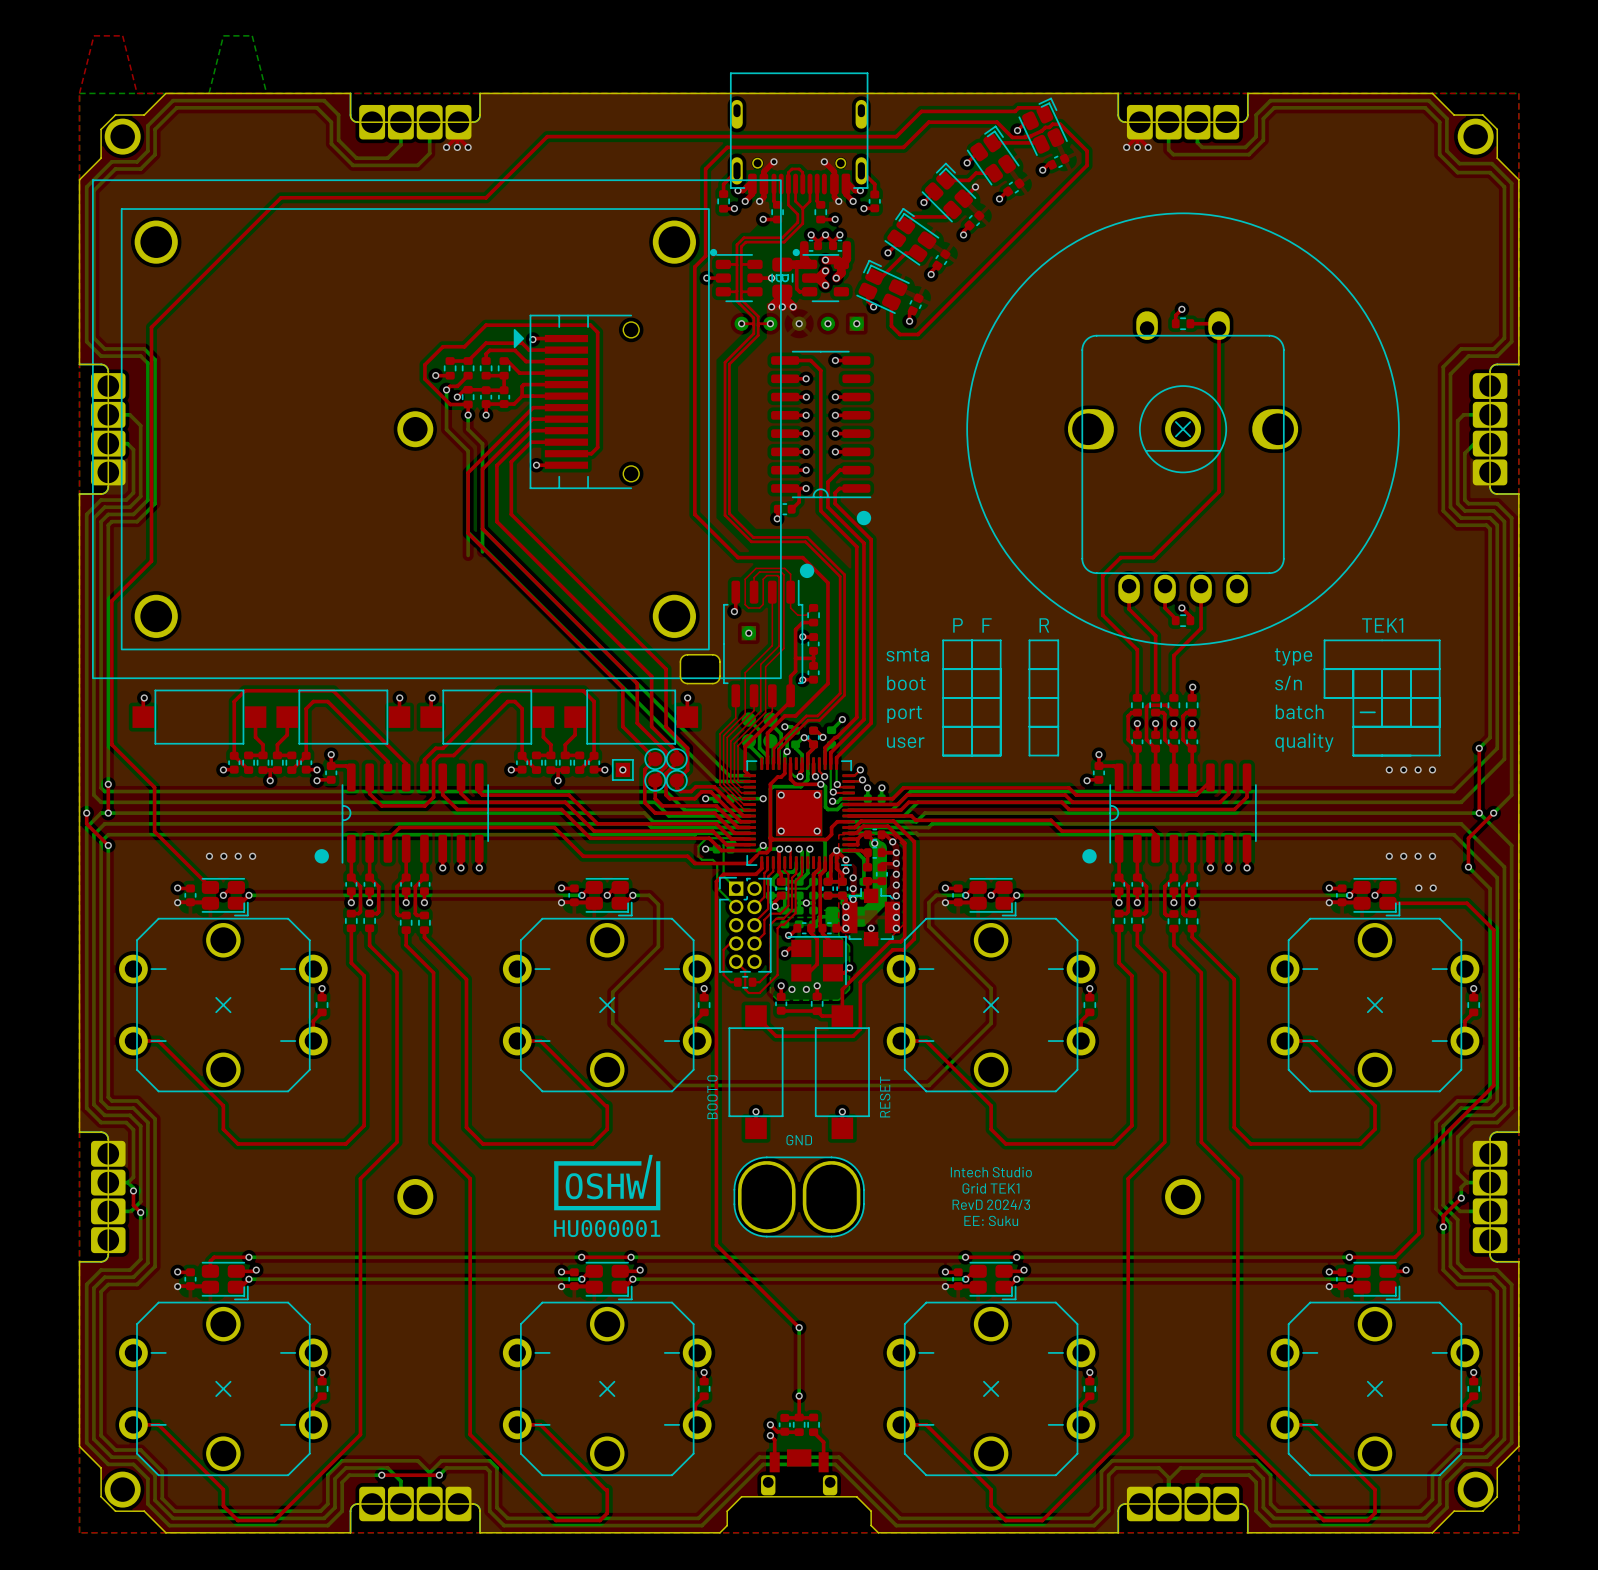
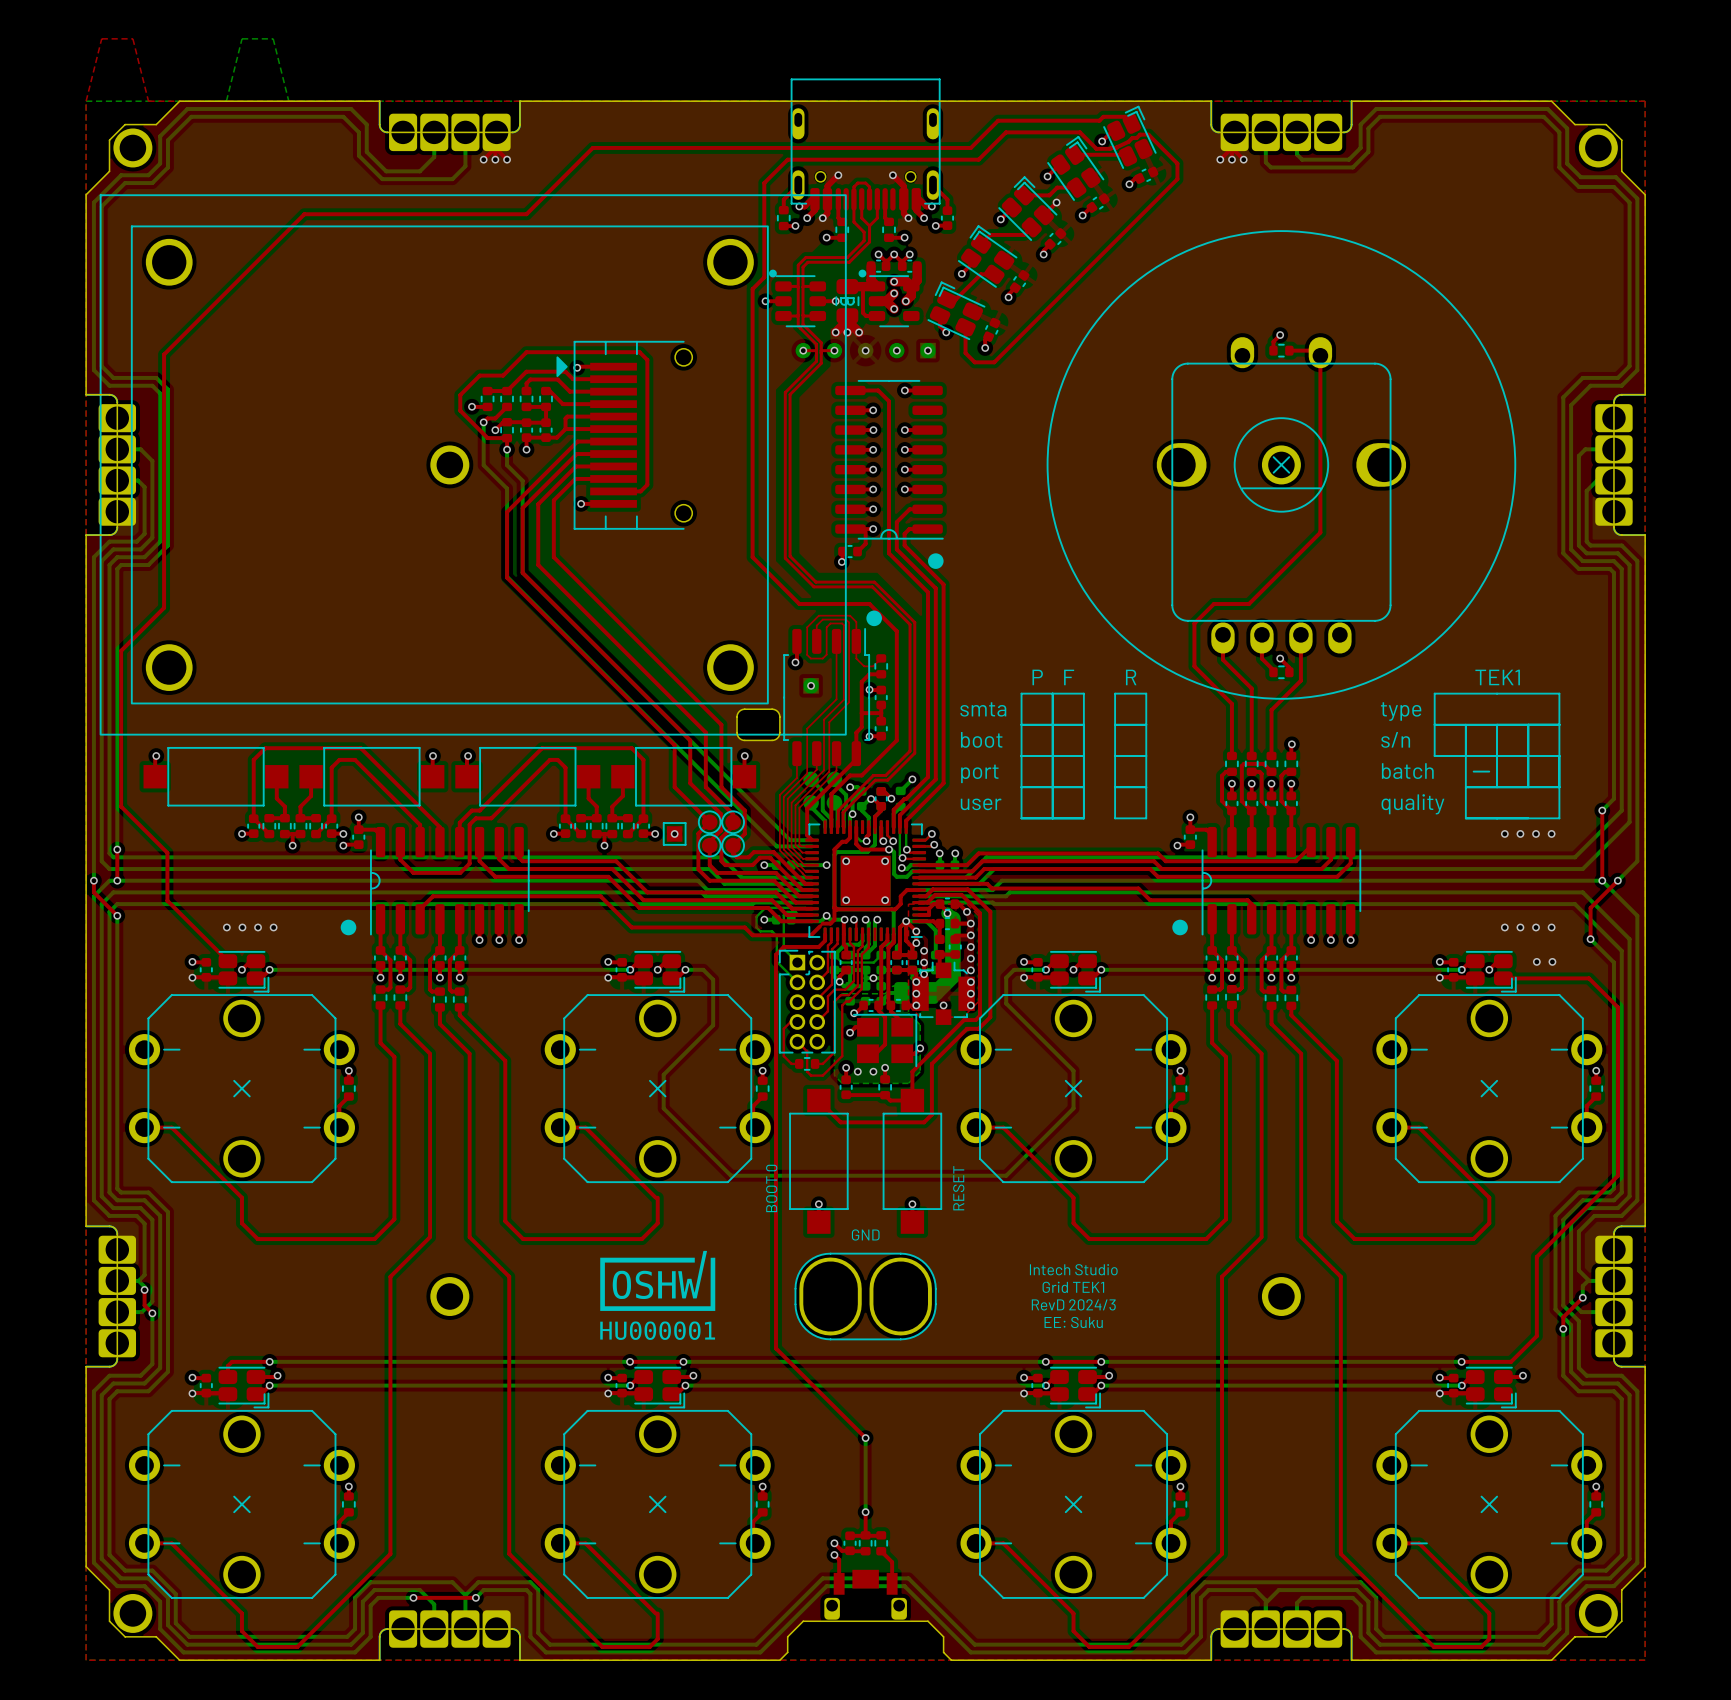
bottom track: (482, 528) (482, 551) -> none
bottom track: (468, 532) (468, 555) -> none

